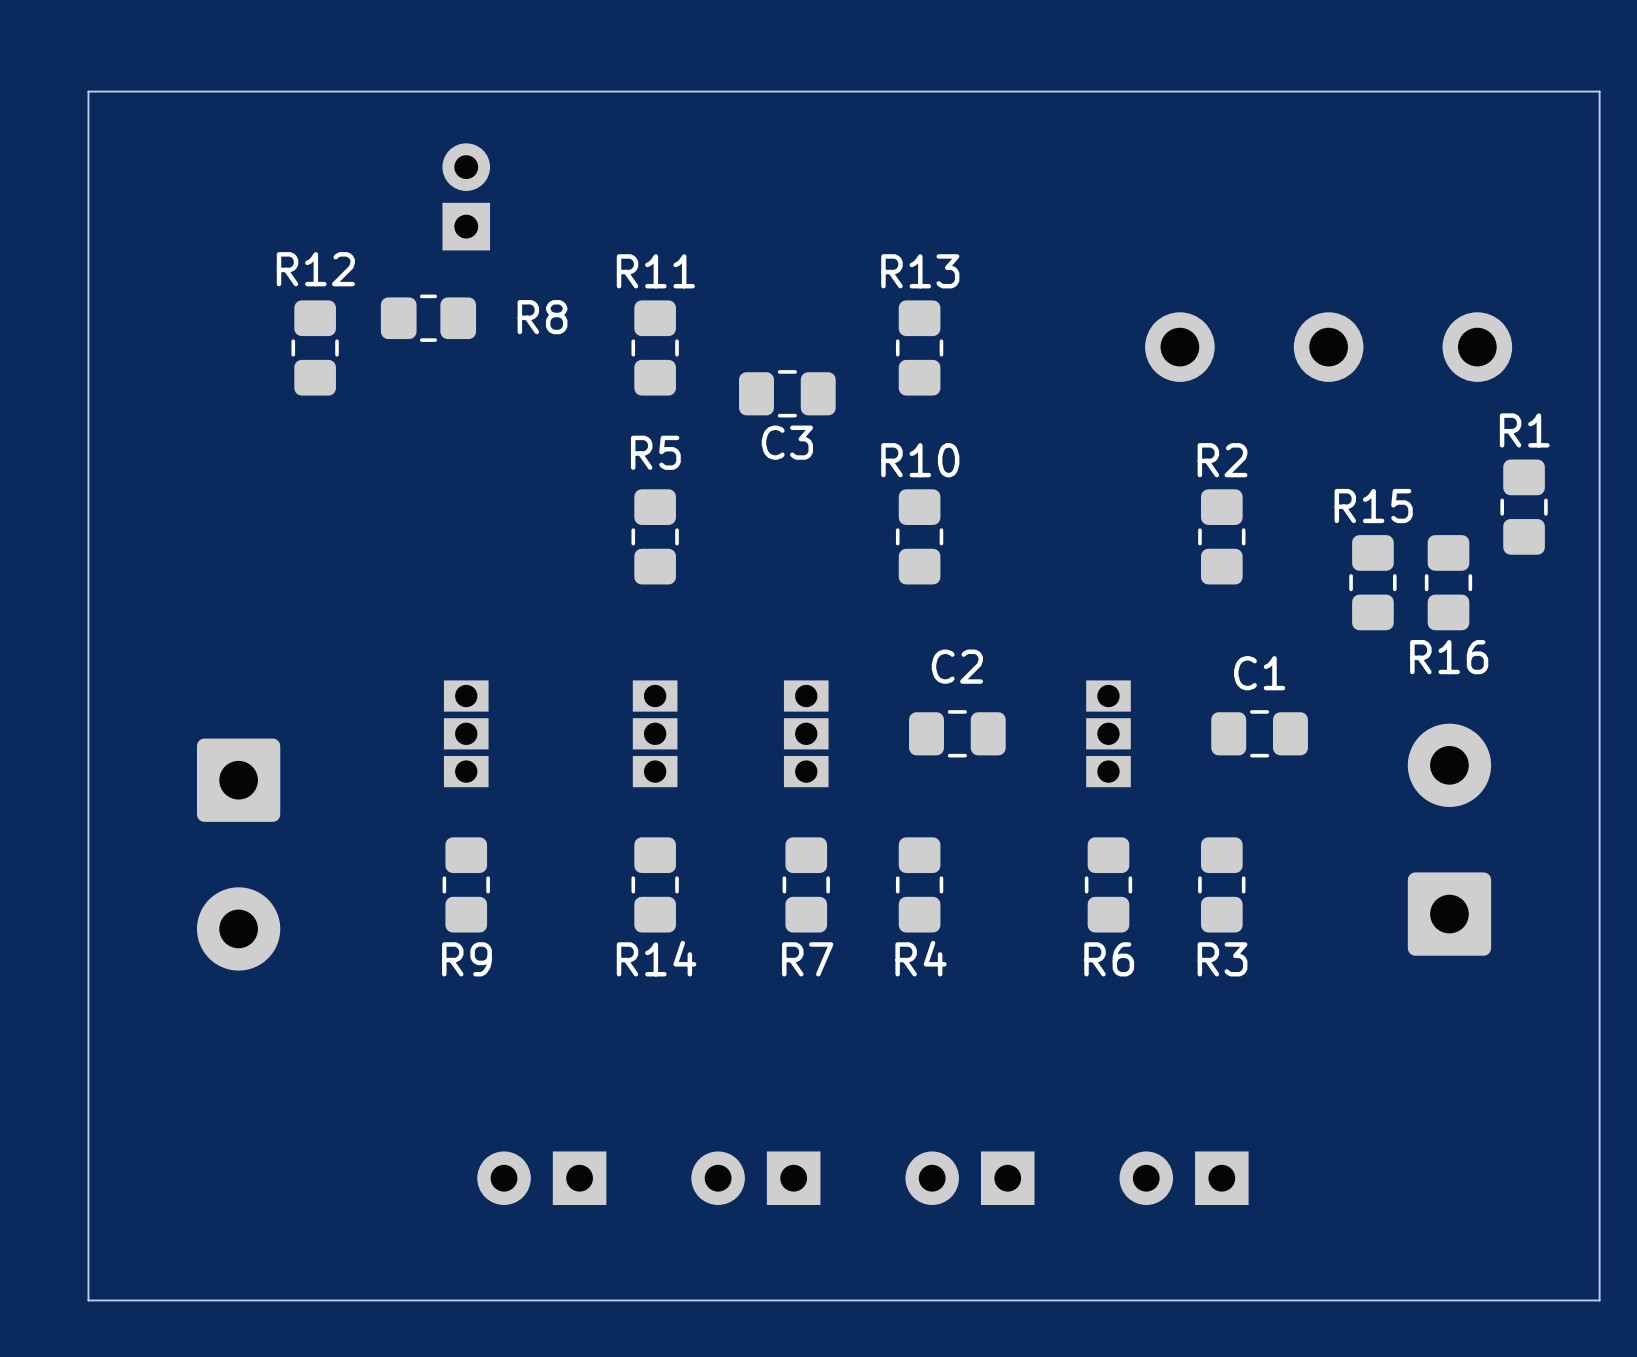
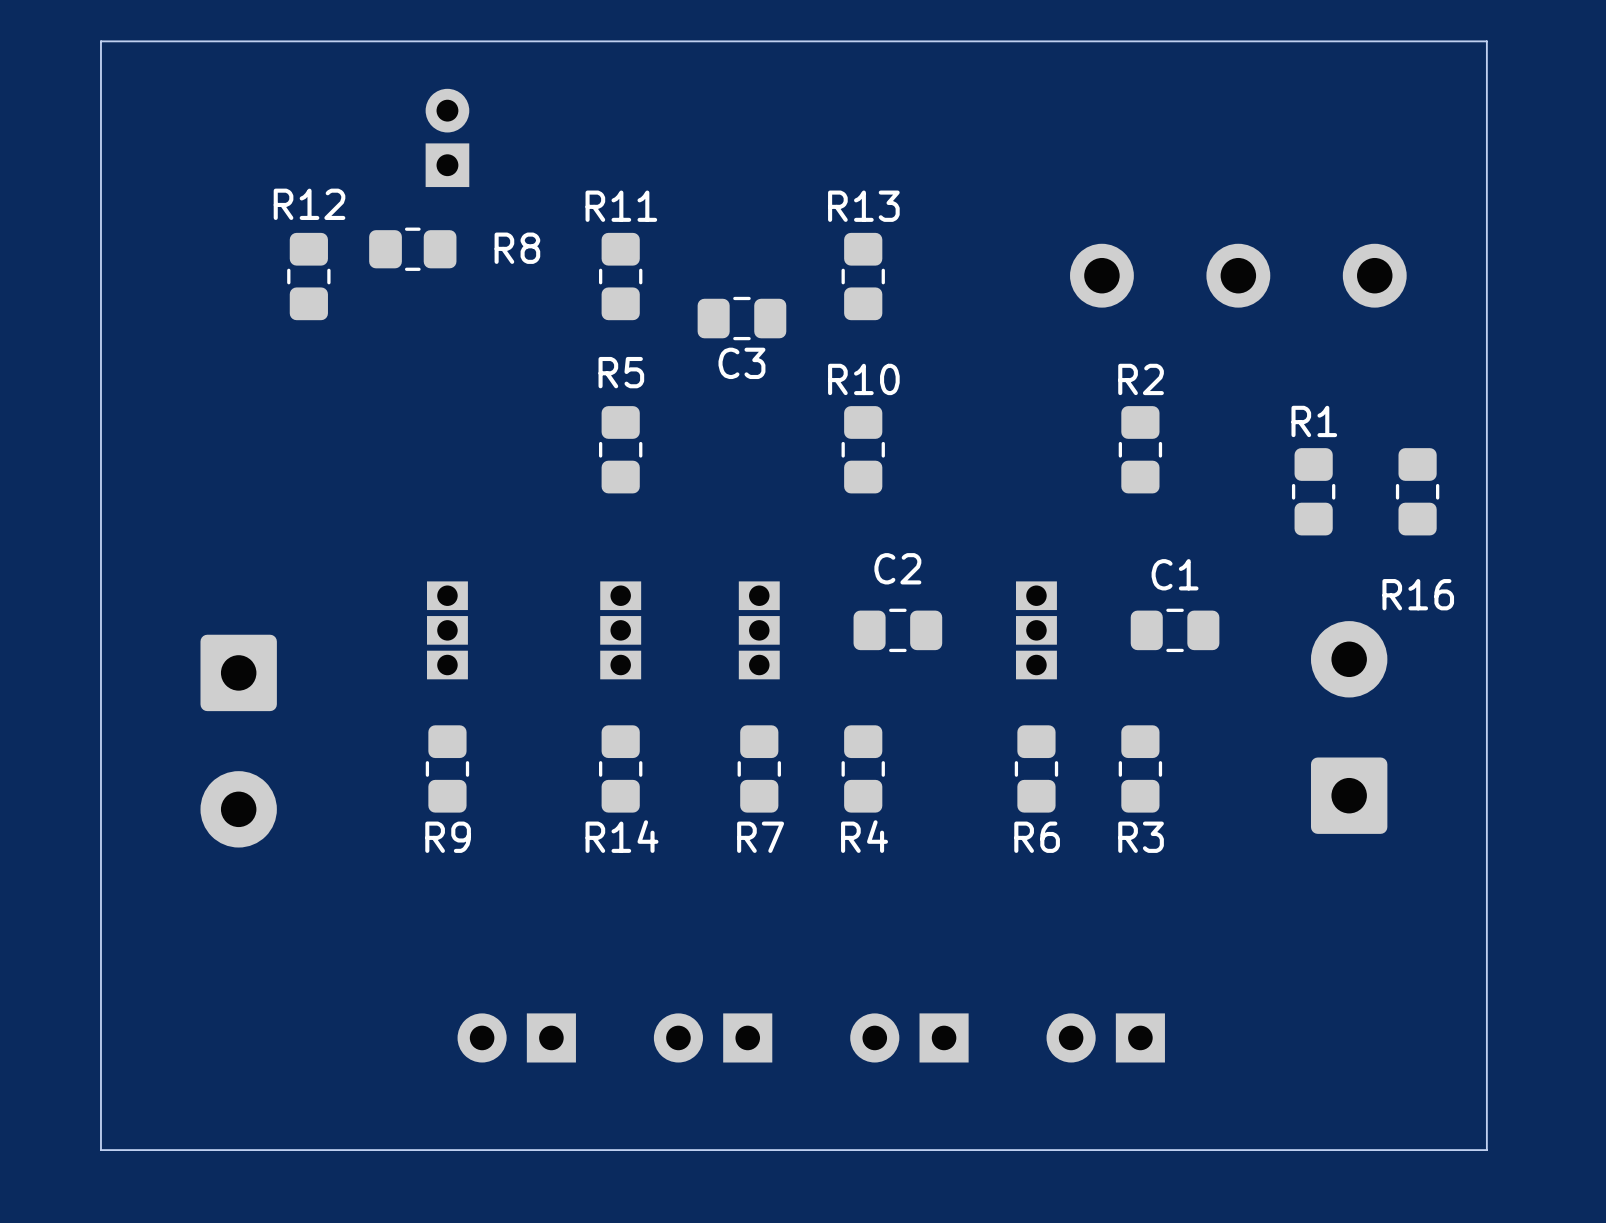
R1 position: (1524, 507) -> (1313, 491)
R15: (1372, 582) -> none
R16 position: (1448, 582) -> (1417, 491)
R16 name position: R16 (1449, 657) -> R16 (1418, 594)

